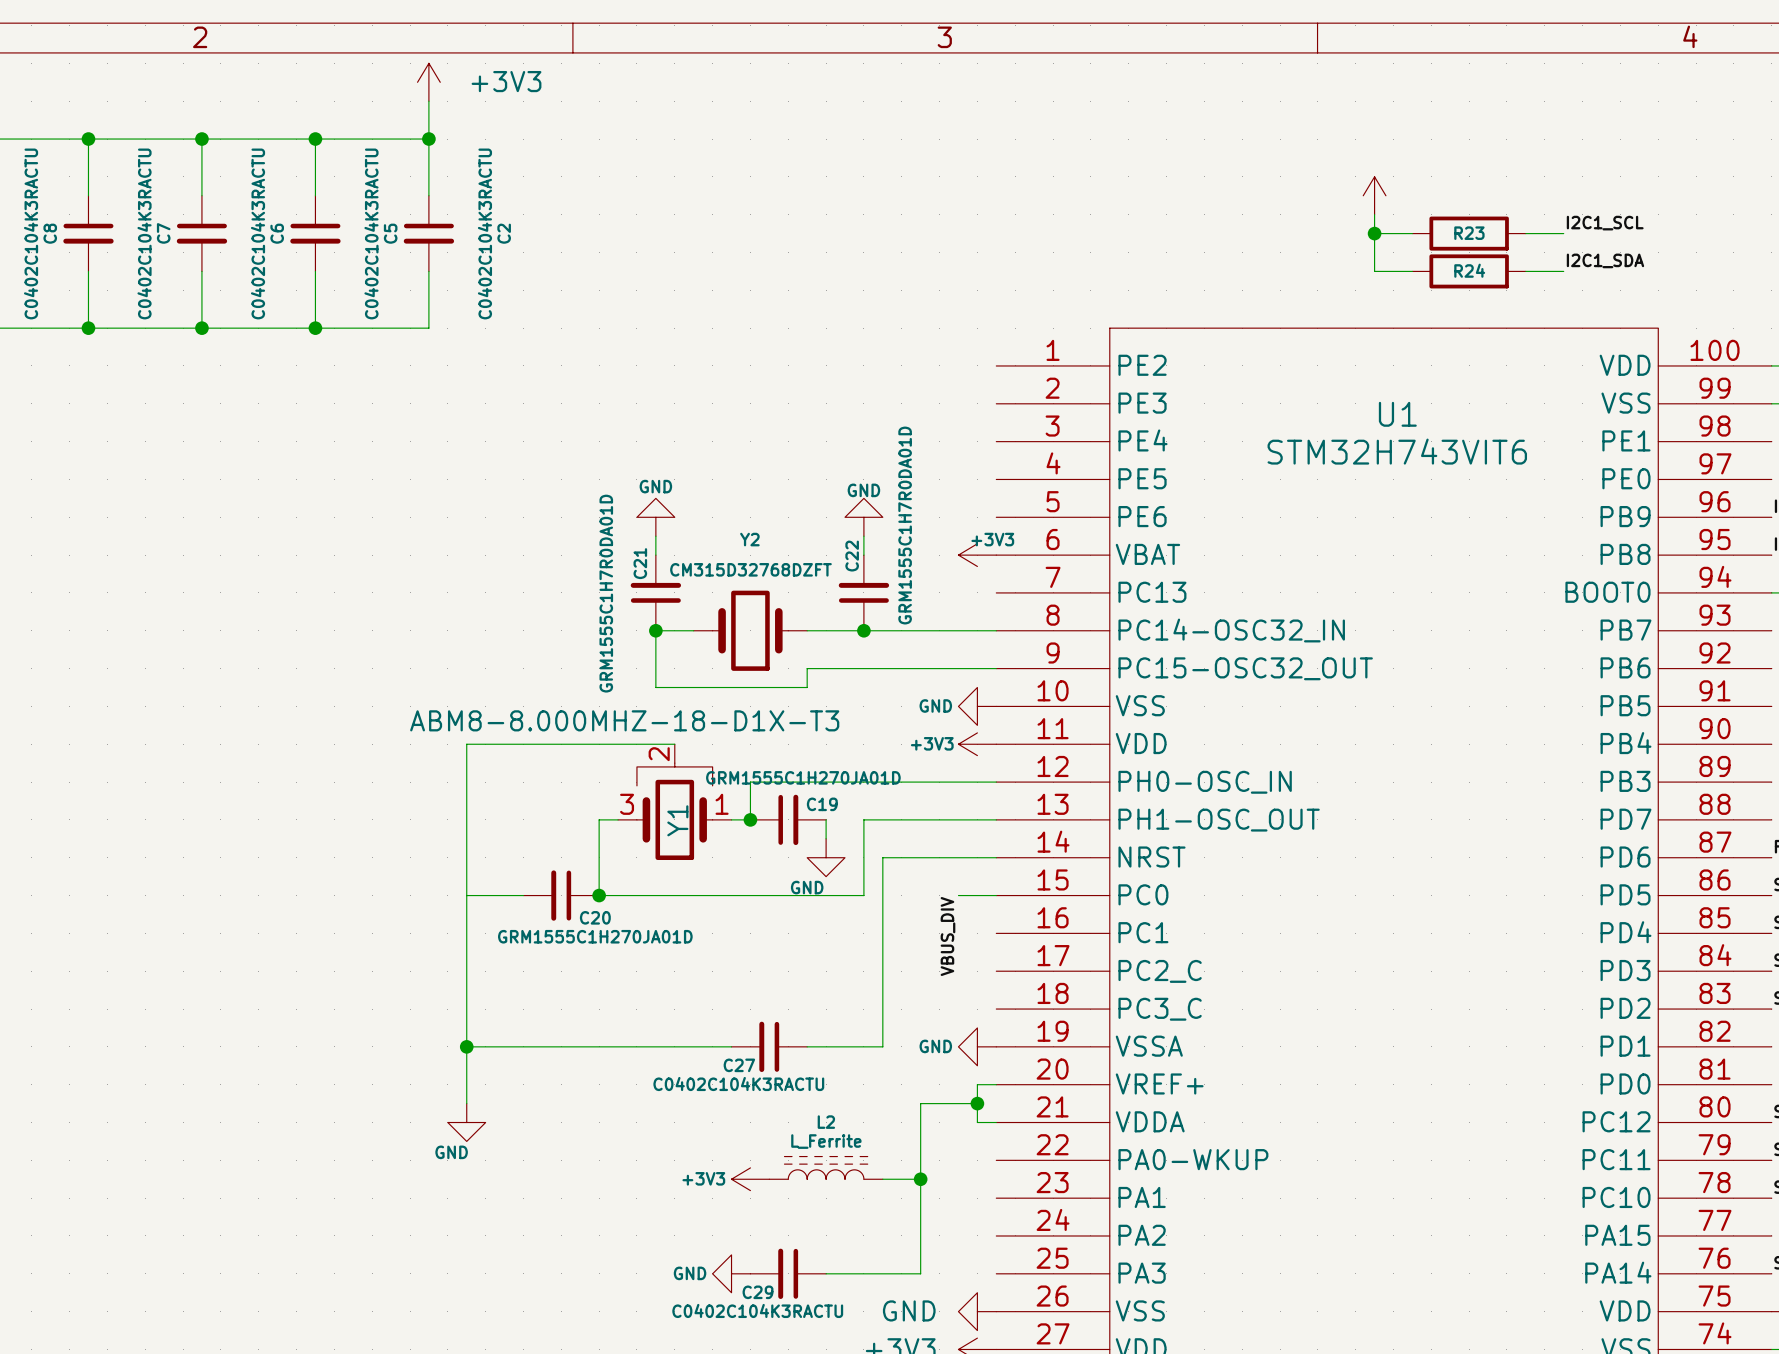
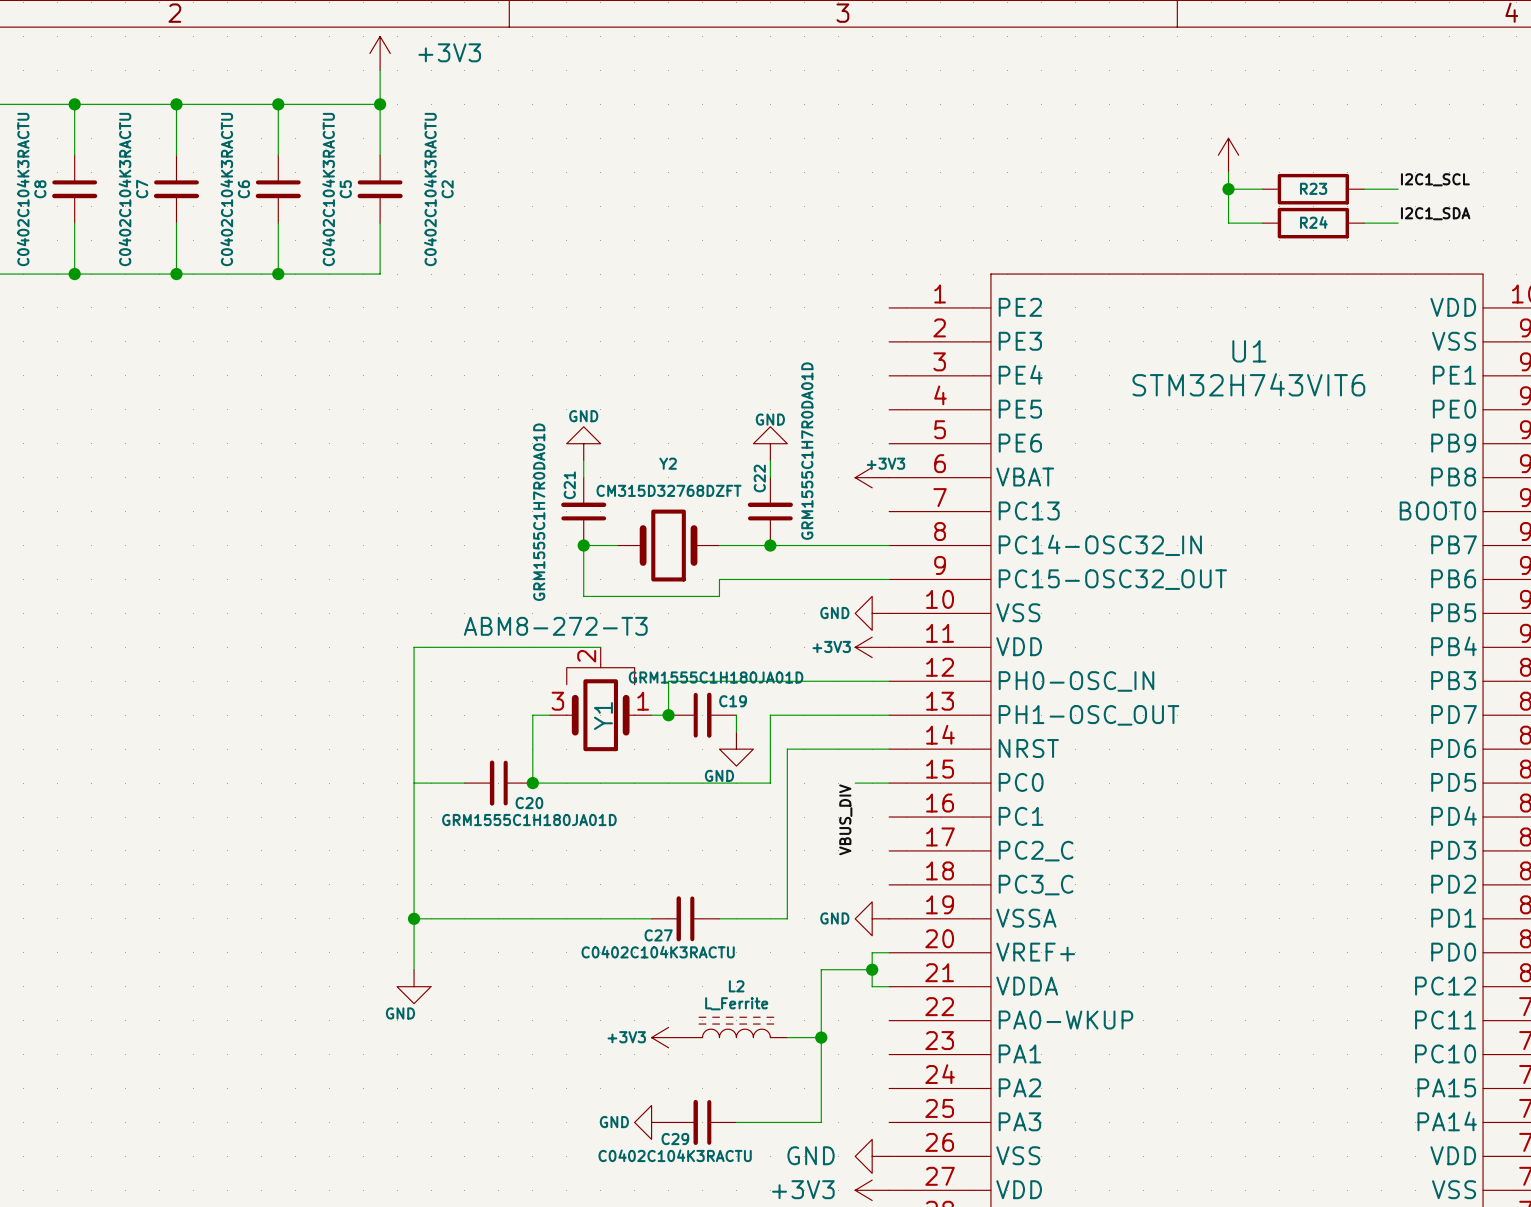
Y1 value: ABM8-8.000MHZ-18-D1X-T3 (624, 720) -> ABM8-272-T3 (555, 626)
C19 value: GRM1555C1H270JA01D (803, 777) -> GRM1555C1H180JA01D (716, 677)
C20 value: GRM1555C1H270JA01D (595, 936) -> GRM1555C1H180JA01D (529, 820)

